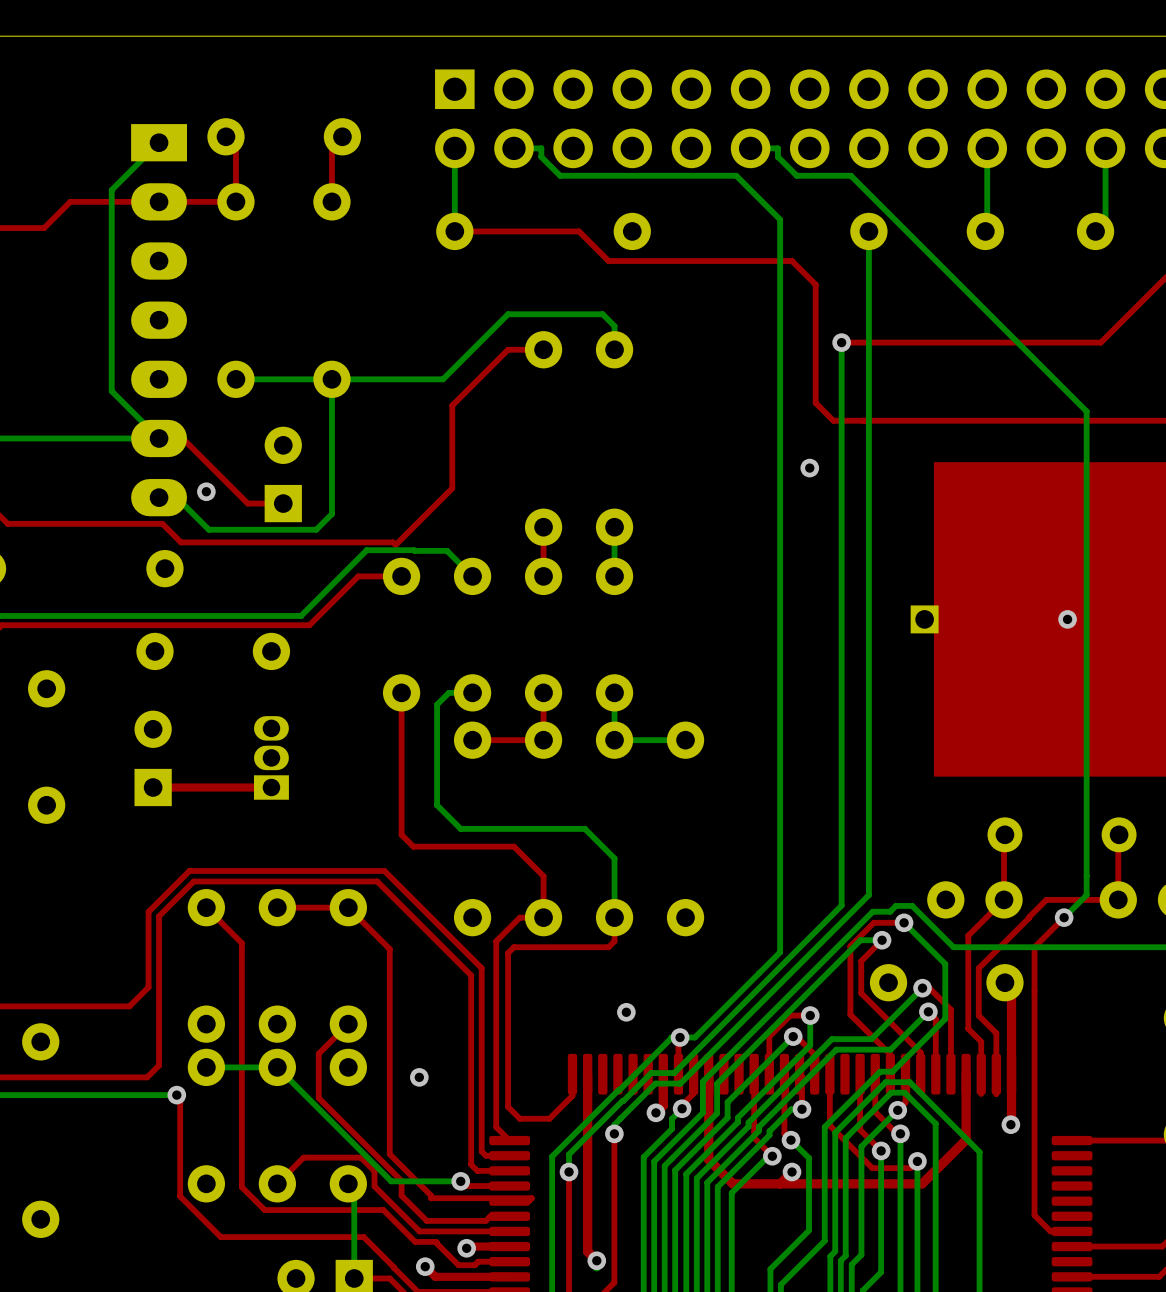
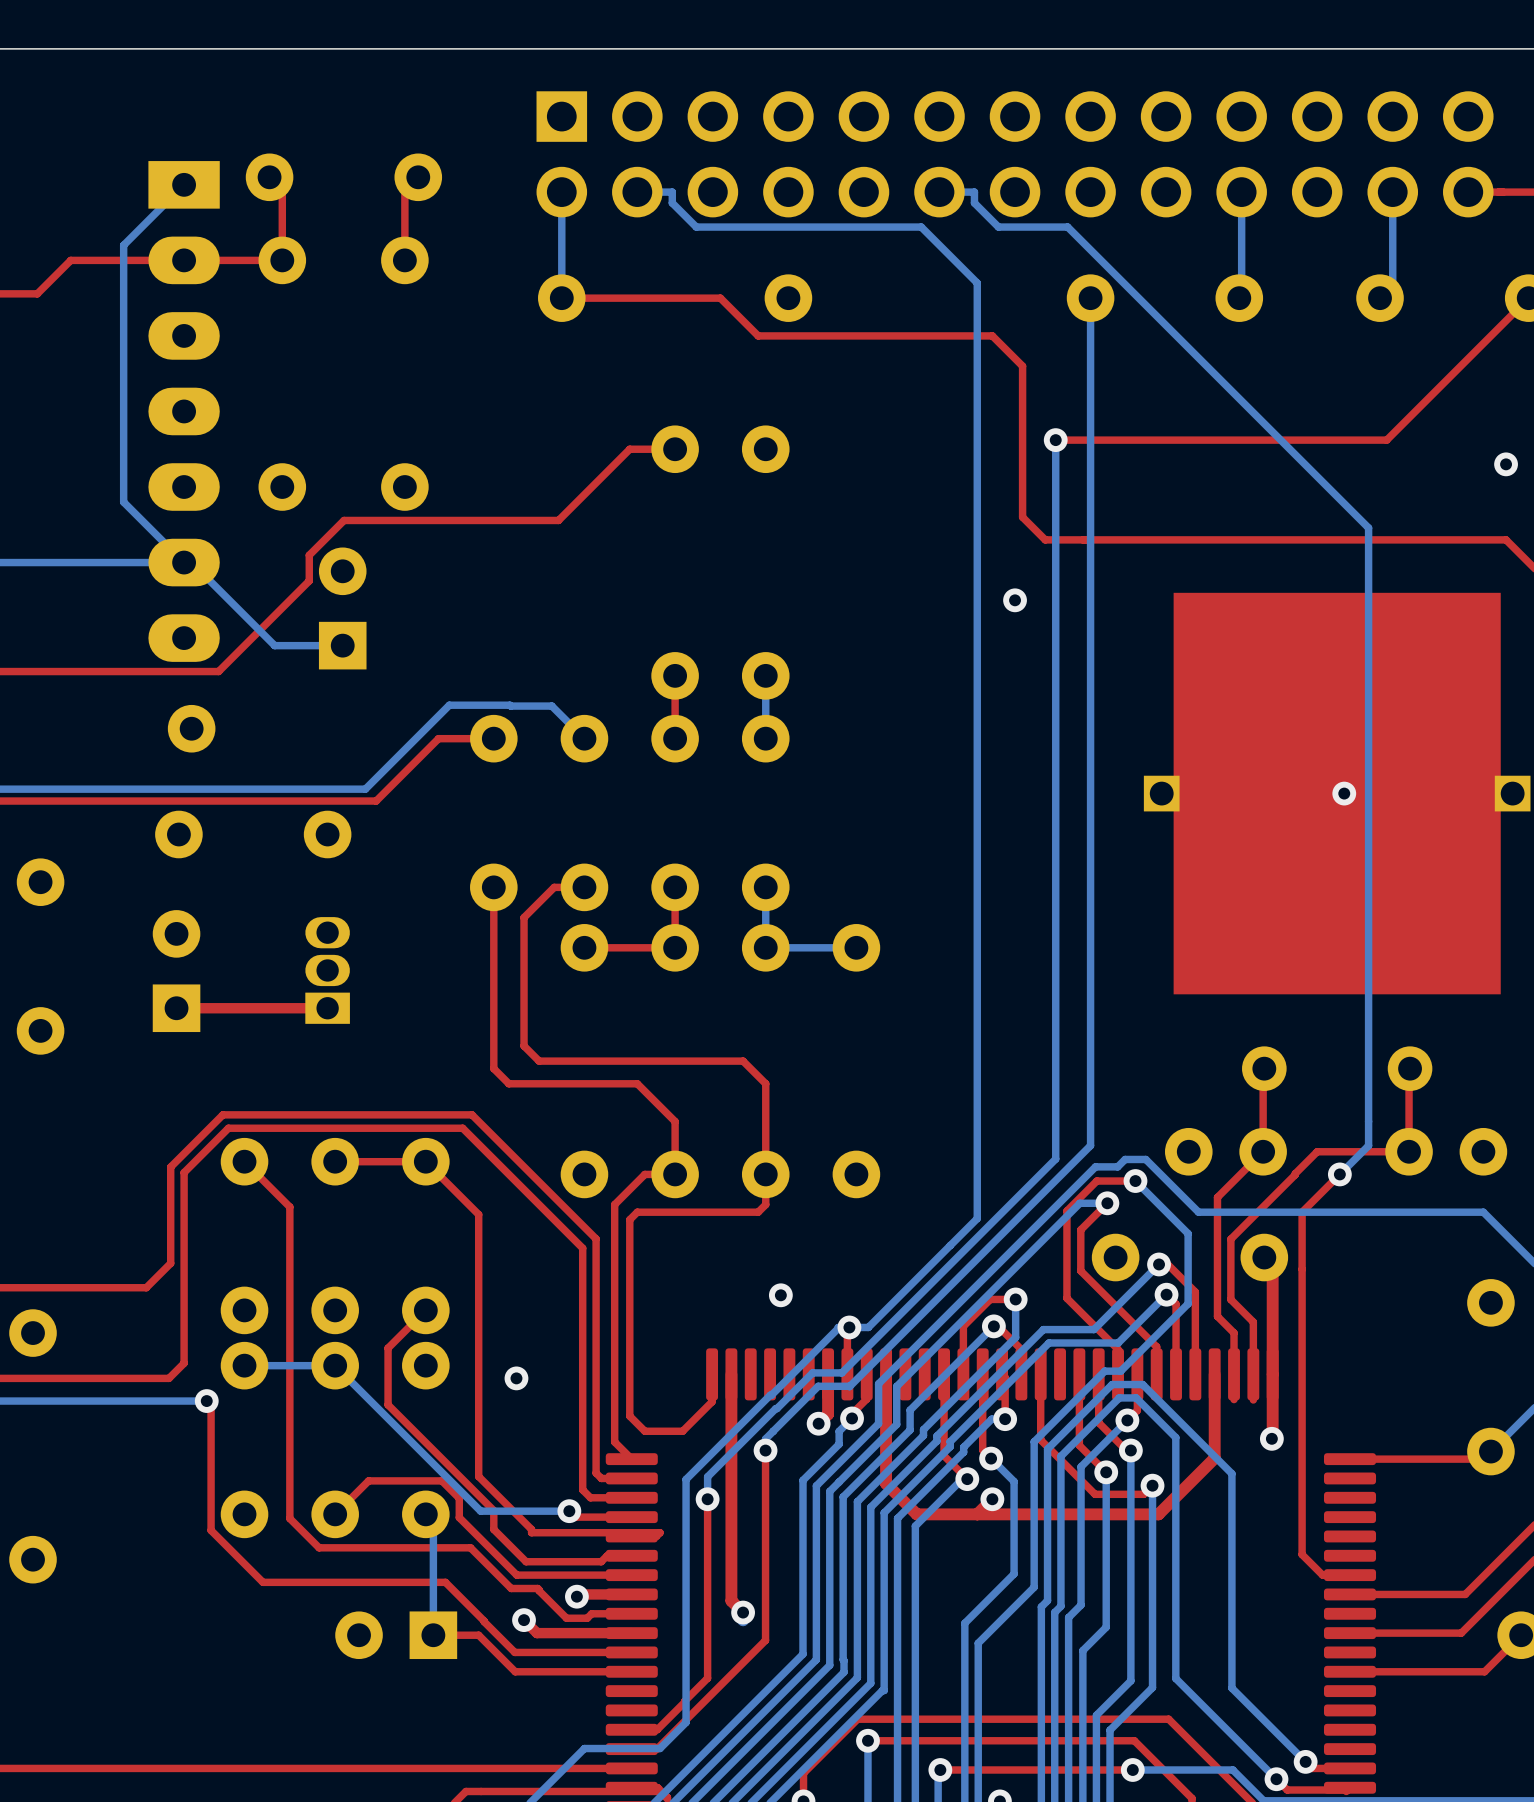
bottom track: (614, 349) (614, 326) (602, 314) (508, 314) (443, 379) (235, 379) -> none
bottom track: (331, 379) (331, 514) (316, 529) (208, 529) (176, 497) (159, 497) -> none
top track: (452, 405) (452, 488) (395, 544) (393, 542) (181, 542) (162, 523) -> (558, 520) (344, 520) (309, 555) (309, 580) (218, 671) (188, 671)
top track: (159, 438) (182, 438) (247, 503) (283, 503) -> none
bottom track: none -> (191, 562) (274, 645) (342, 645)
via: (206, 491) -> none
bottom track: (472, 692) (448, 692) (437, 704) (437, 805) (460, 828) (584, 828) (614, 858) (614, 917) -> none
top track: none -> (584, 887) (554, 887) (524, 917) (524, 1046) (539, 1061) (743, 1061) (765, 1083) (765, 1174)

